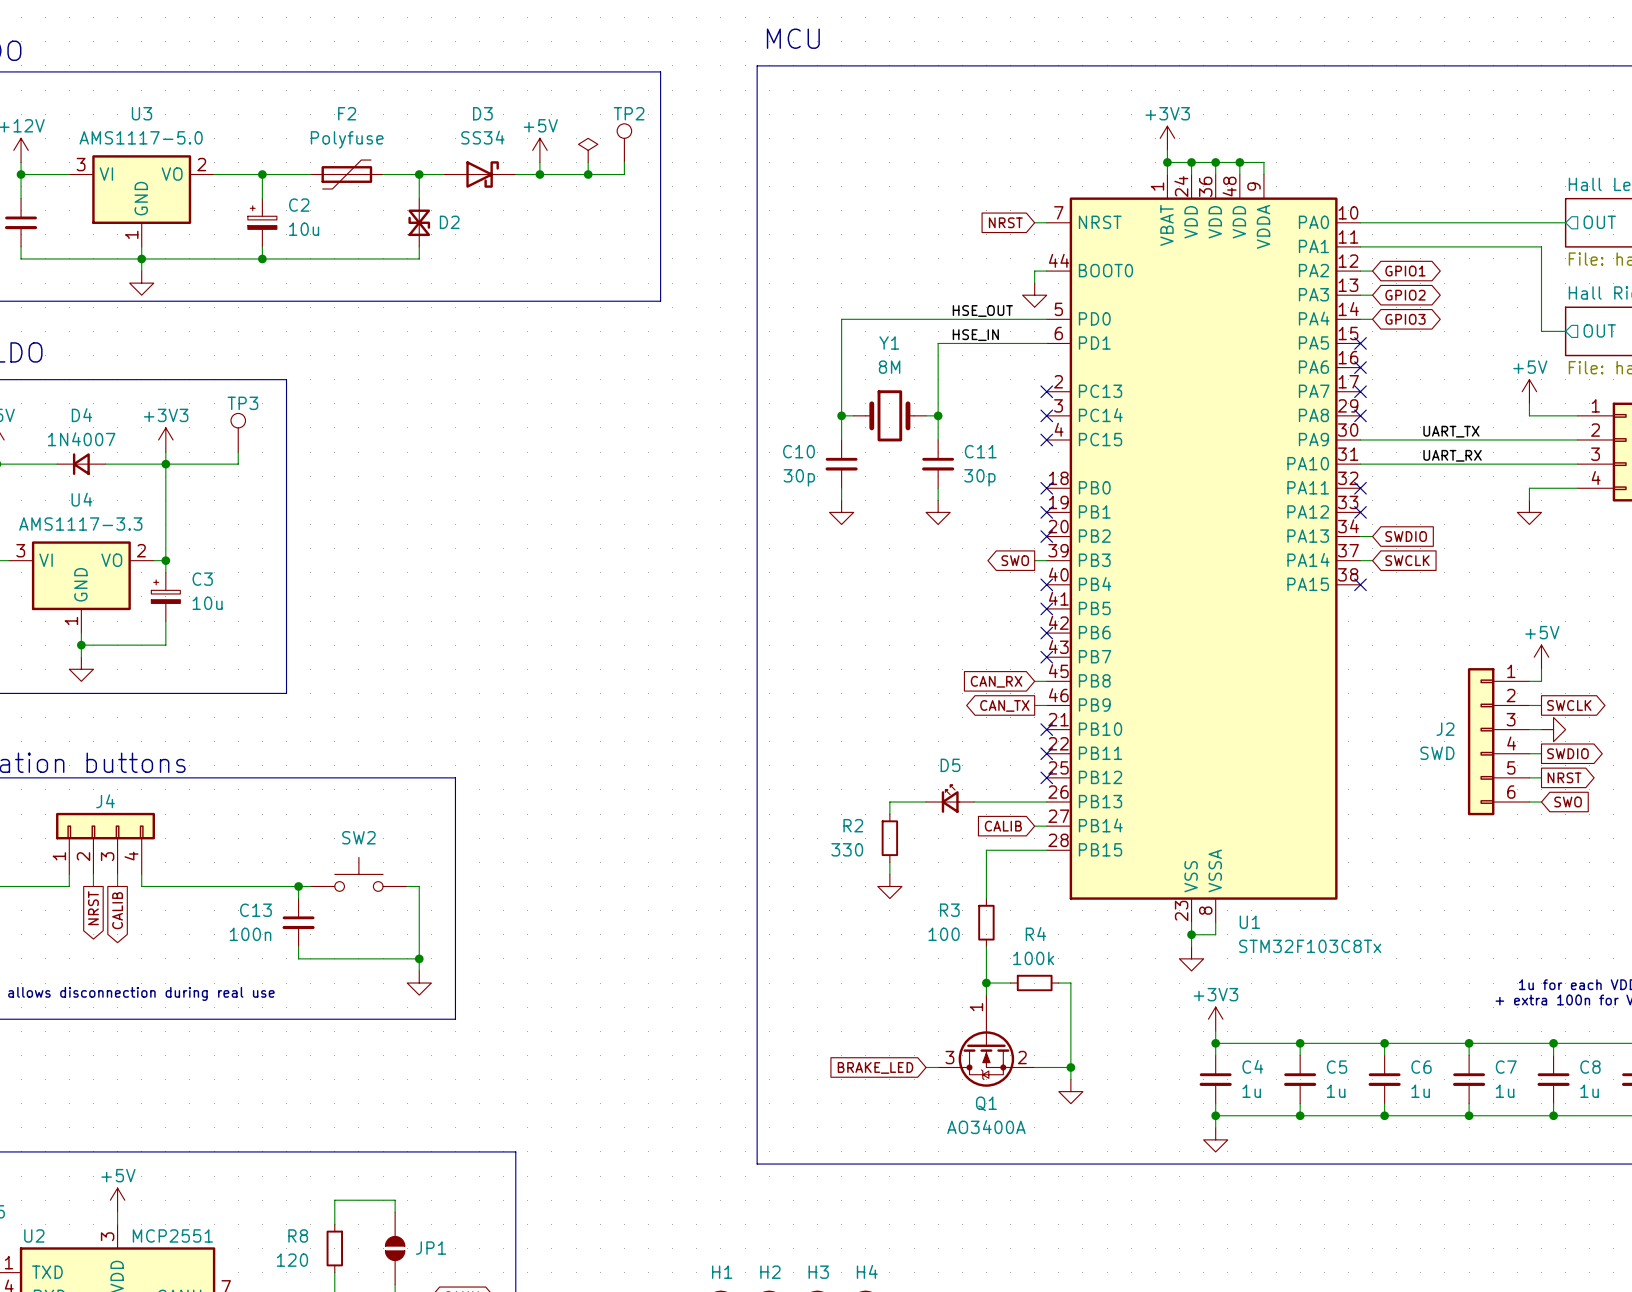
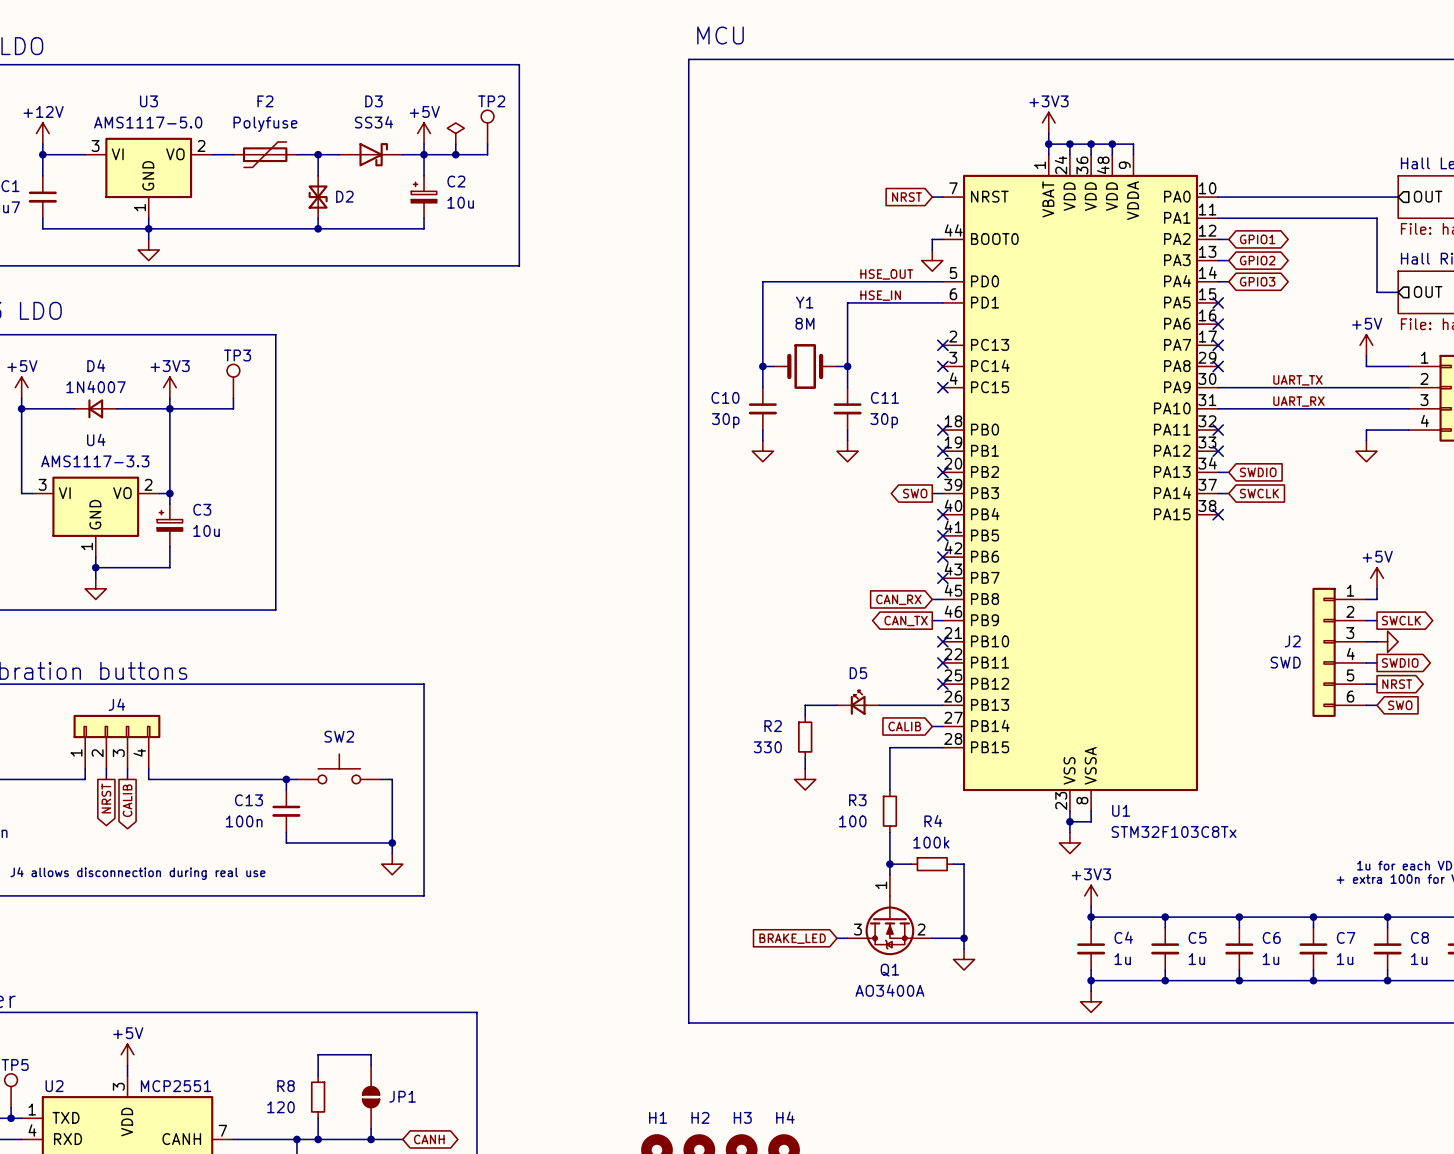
line: (564, 71) (660, 71) (660, 301) (564, 301) -> (519, 64) (519, 265)
TP2 position: (624, 143) -> (487, 127)
power symbol position: +5V (539, 150) -> +5V (424, 133)
power symbol position: (588, 150) -> (455, 133)
wire: none -> (424, 144) (424, 175)
wire: (588, 162) (588, 174) -> none
wire: (624, 162) (624, 174) (527, 174) -> (487, 144) (487, 154)
wire: (262, 174) (262, 198) -> (318, 154) (318, 175)
junction: (262, 174) -> none
junction: none -> (318, 154)
F2 position: (346, 174) -> (265, 154)
wire: (419, 174) (419, 198) -> none
junction: (419, 174) -> none
junction: none -> (424, 154)
D3 position: (479, 174) -> (371, 154)
junction: none -> (455, 154)
junction: (539, 174) -> none
junction: (588, 174) -> none
C2 position: (262, 222) -> (424, 197)
D2 position: (419, 222) -> (318, 197)
wire: (262, 246) (262, 258) -> (318, 218) (318, 228)
wire: (419, 246) (419, 258) -> (424, 218) (424, 228) (392, 228)
junction: (262, 258) -> none
junction: none -> (318, 228)

